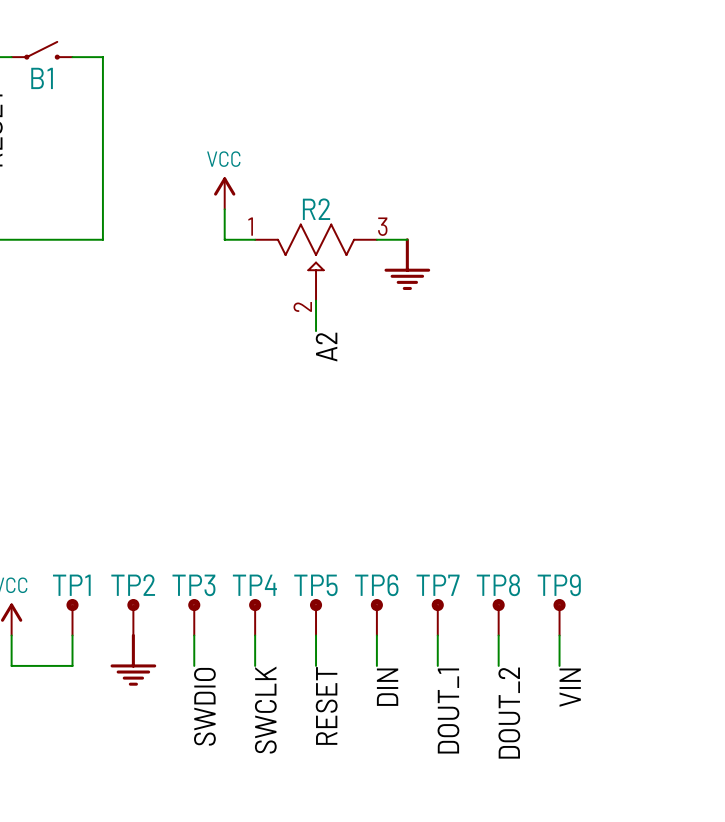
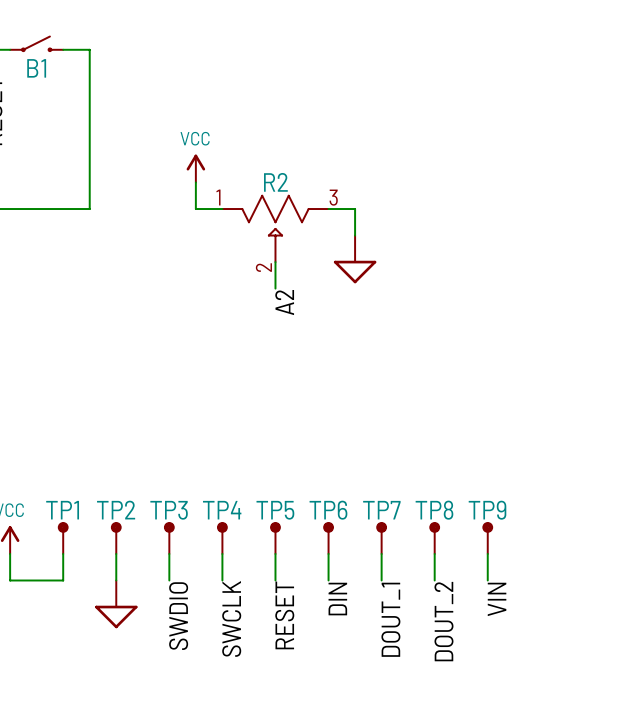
power symbol: (407, 264) -> none
power symbol: none -> (355, 259)
power symbol: (133, 659) -> none
power symbol: none -> (116, 604)

